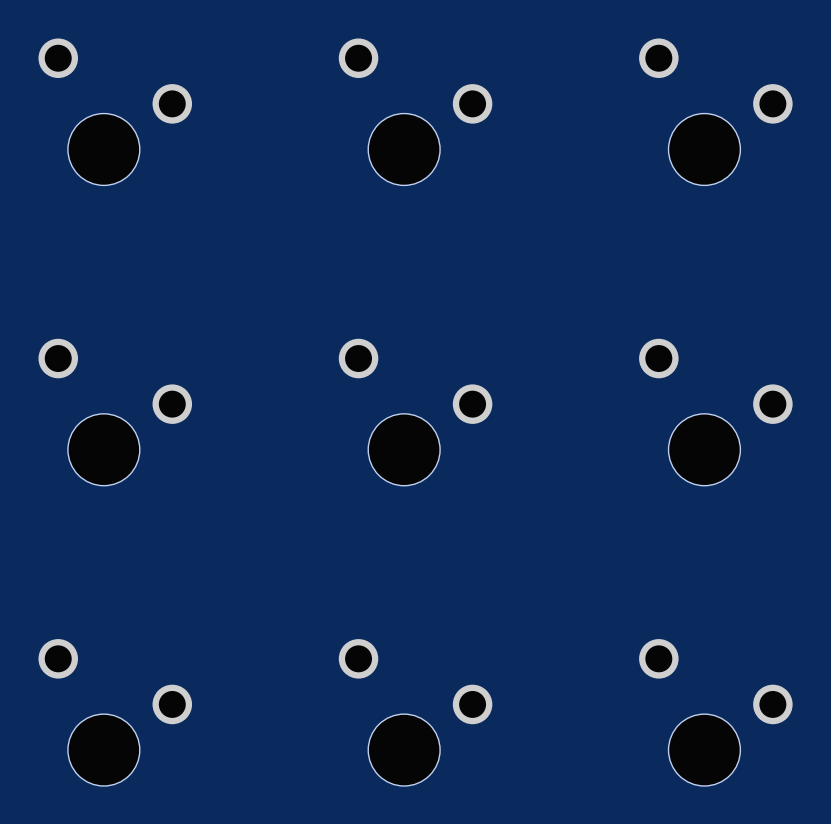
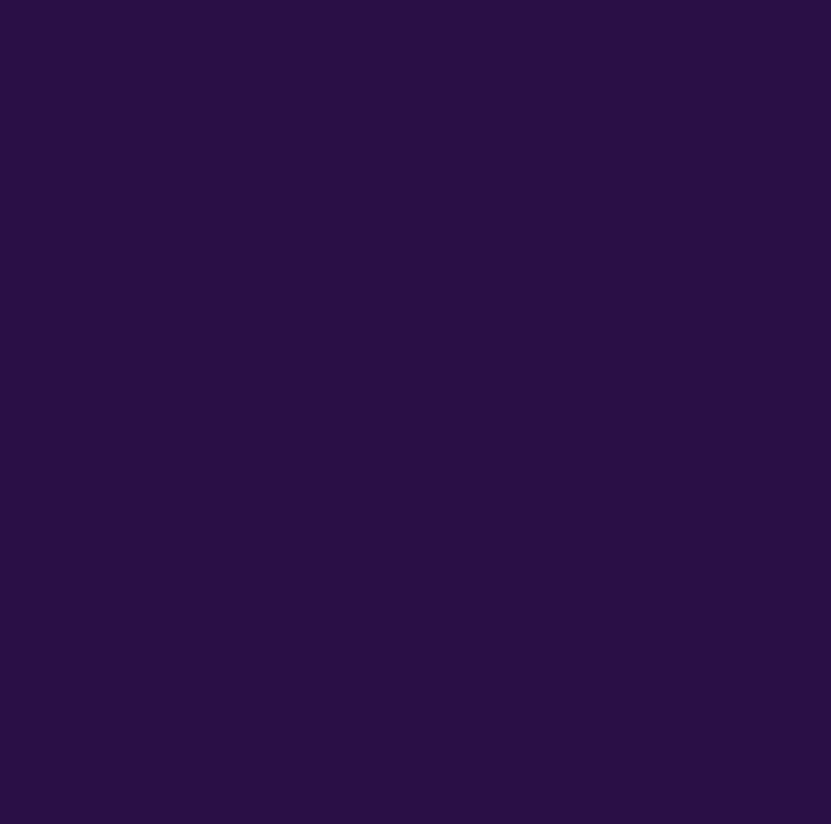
part: (115, 111) -> none
part: (415, 111) -> none
part: (715, 111) -> none
part: (115, 412) -> none
part: (415, 412) -> none
part: (715, 412) -> none
part: (115, 712) -> none
part: (415, 712) -> none
part: (715, 712) -> none

